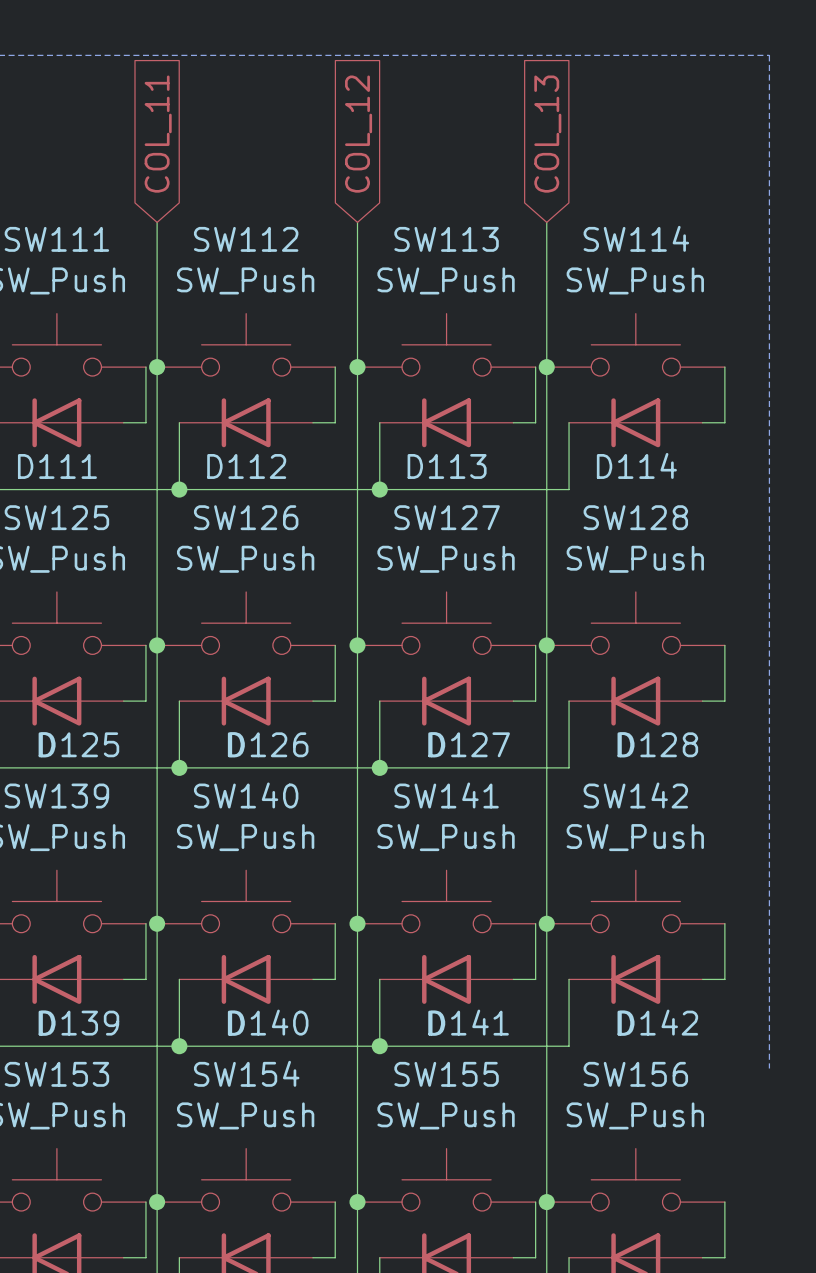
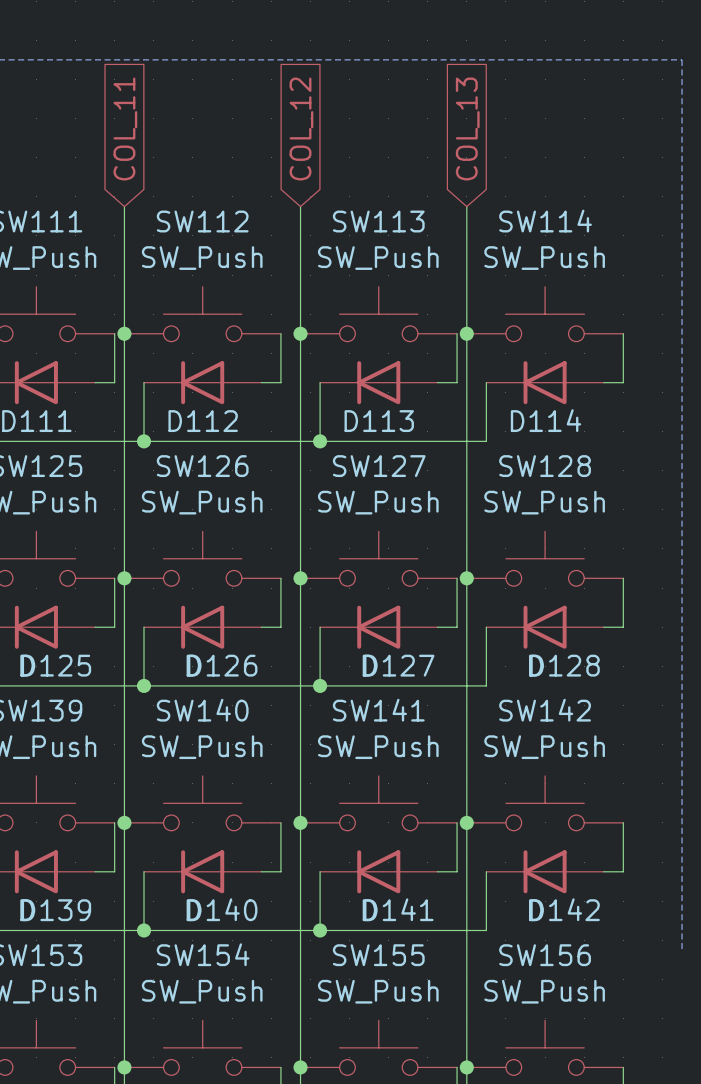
line: (769, 55) (769, 1068) -> (662, 59) (682, 59) (682, 950)

